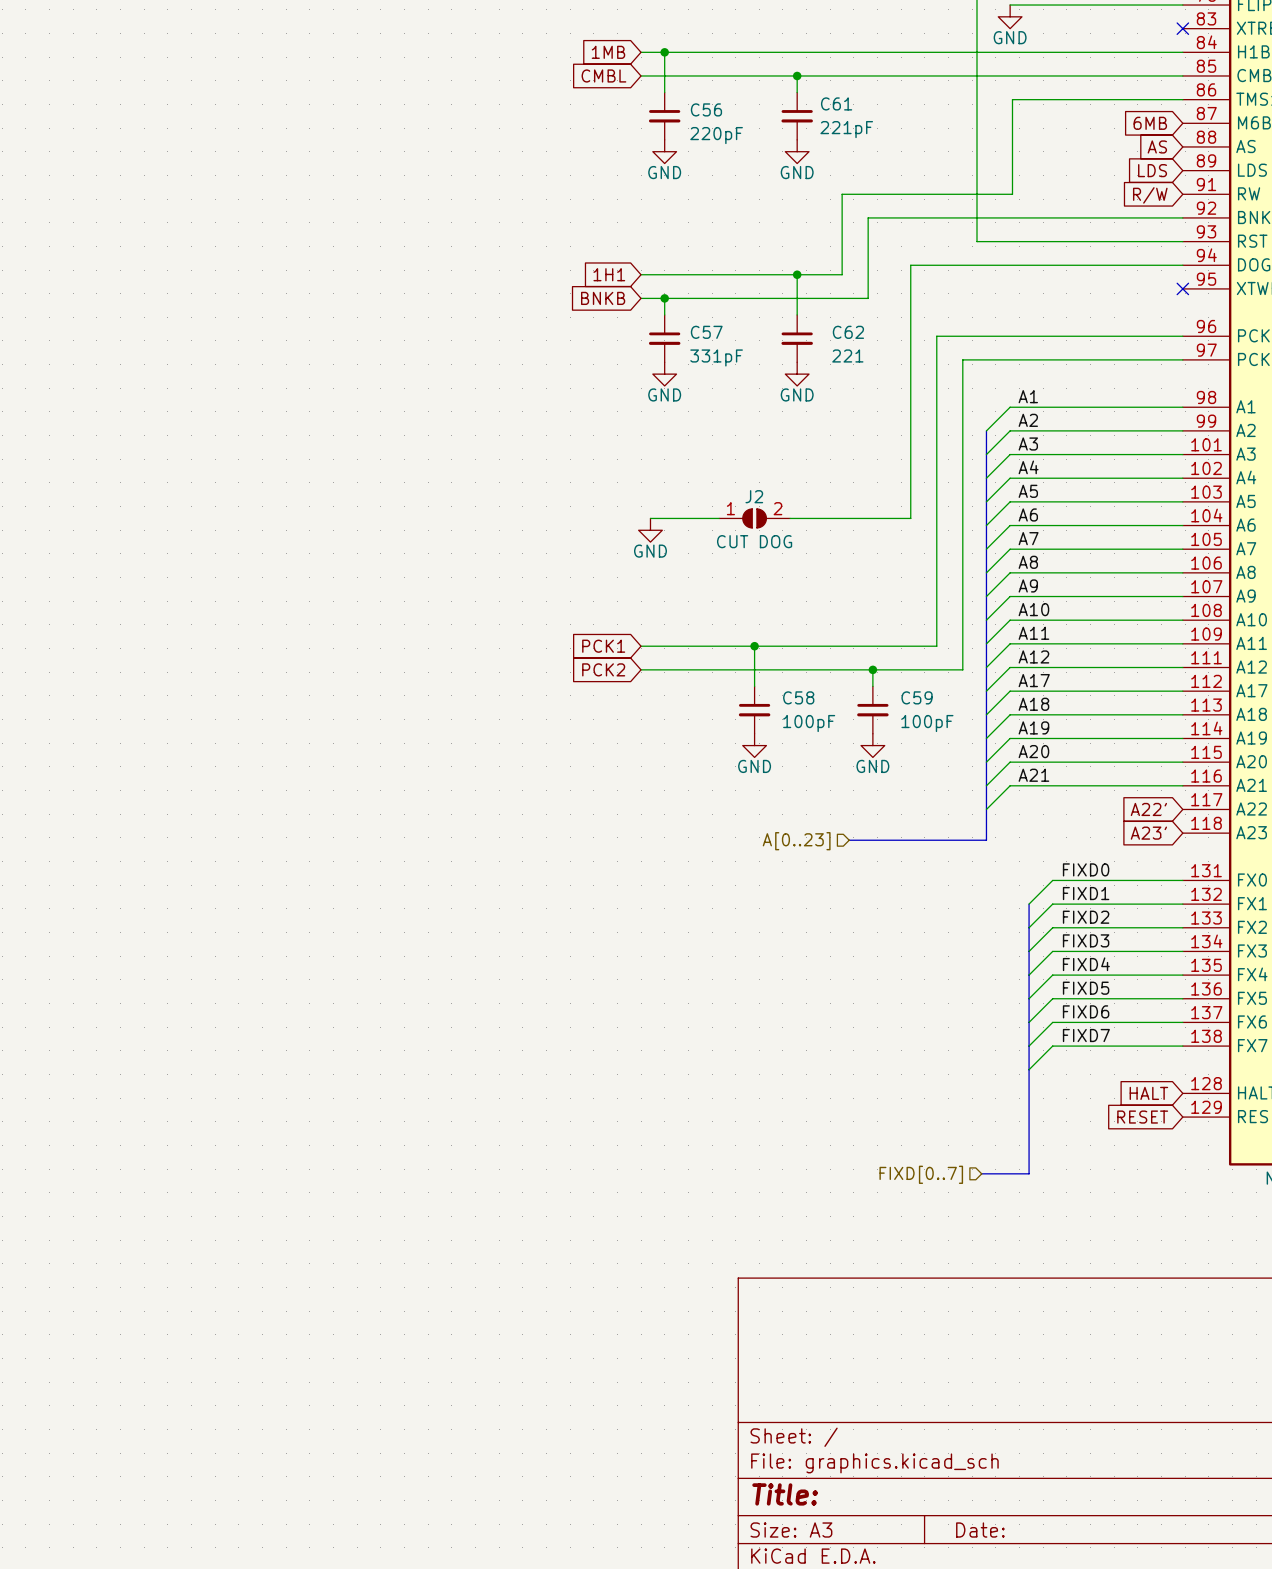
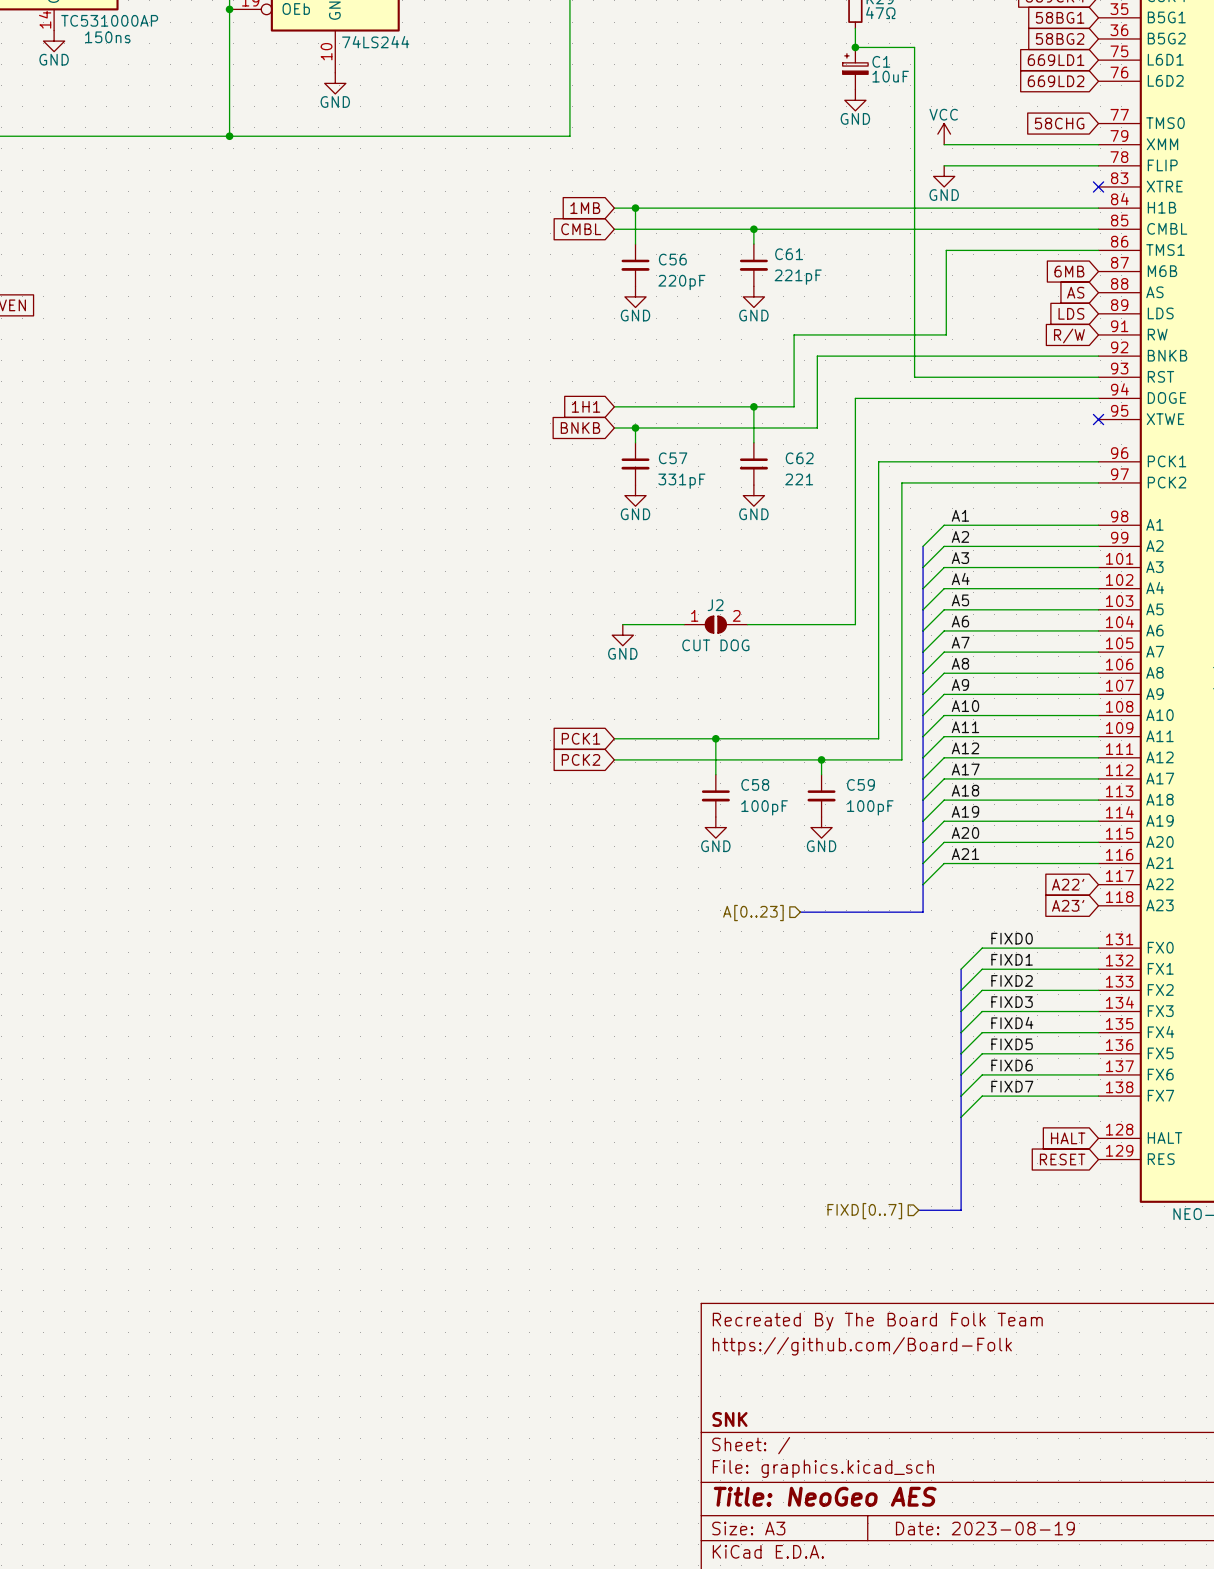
title block: none -> Recreated By The Board Folk Team (877, 1321)
title block: none -> https://github.com/Board-Folk (862, 1346)
title block: none -> SNK (729, 1419)
title block: Title: (785, 1494) -> Title: NeoGeo AES (825, 1496)
title block: Date: (980, 1530) -> Date: 2023-08-19 (985, 1528)

